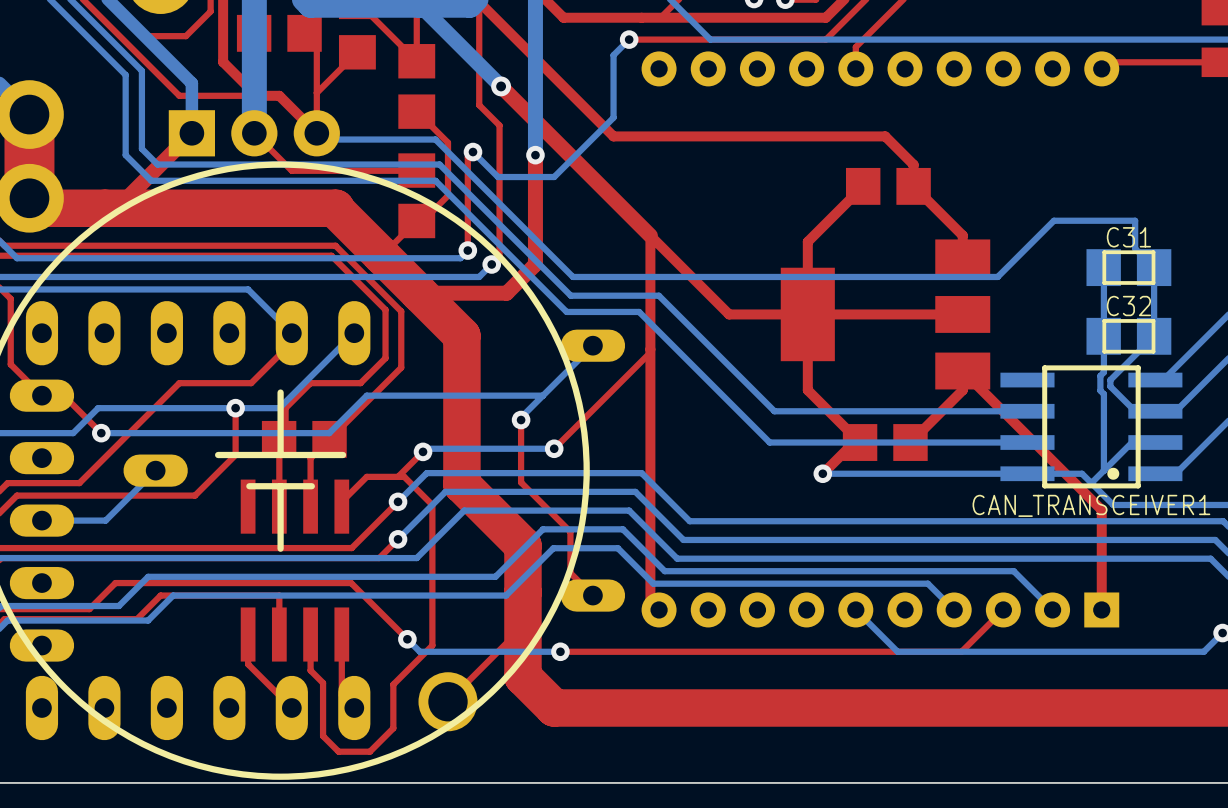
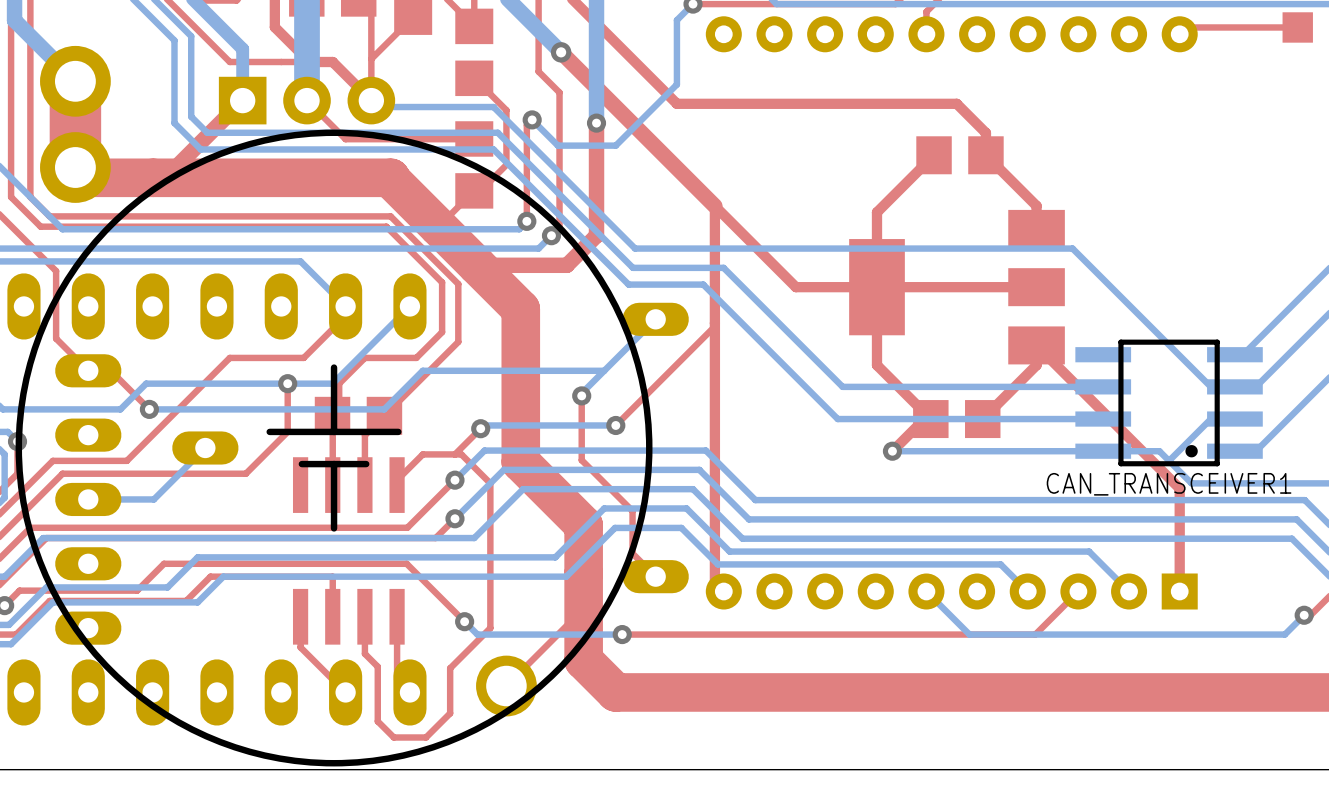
bottom track: (1103, 267) (1103, 372) (1100, 375) (1100, 390) (1103, 394) (1103, 470) -> none
C31: (1128, 267) -> none
bottom track: (997, 276) (1053, 220) (1135, 220) (1135, 248) (1154, 267) (1154, 336) (1110, 380) (1110, 386) (1135, 411) -> (1072, 248) (1210, 386) (1214, 386)
C32: (1128, 336) -> none

